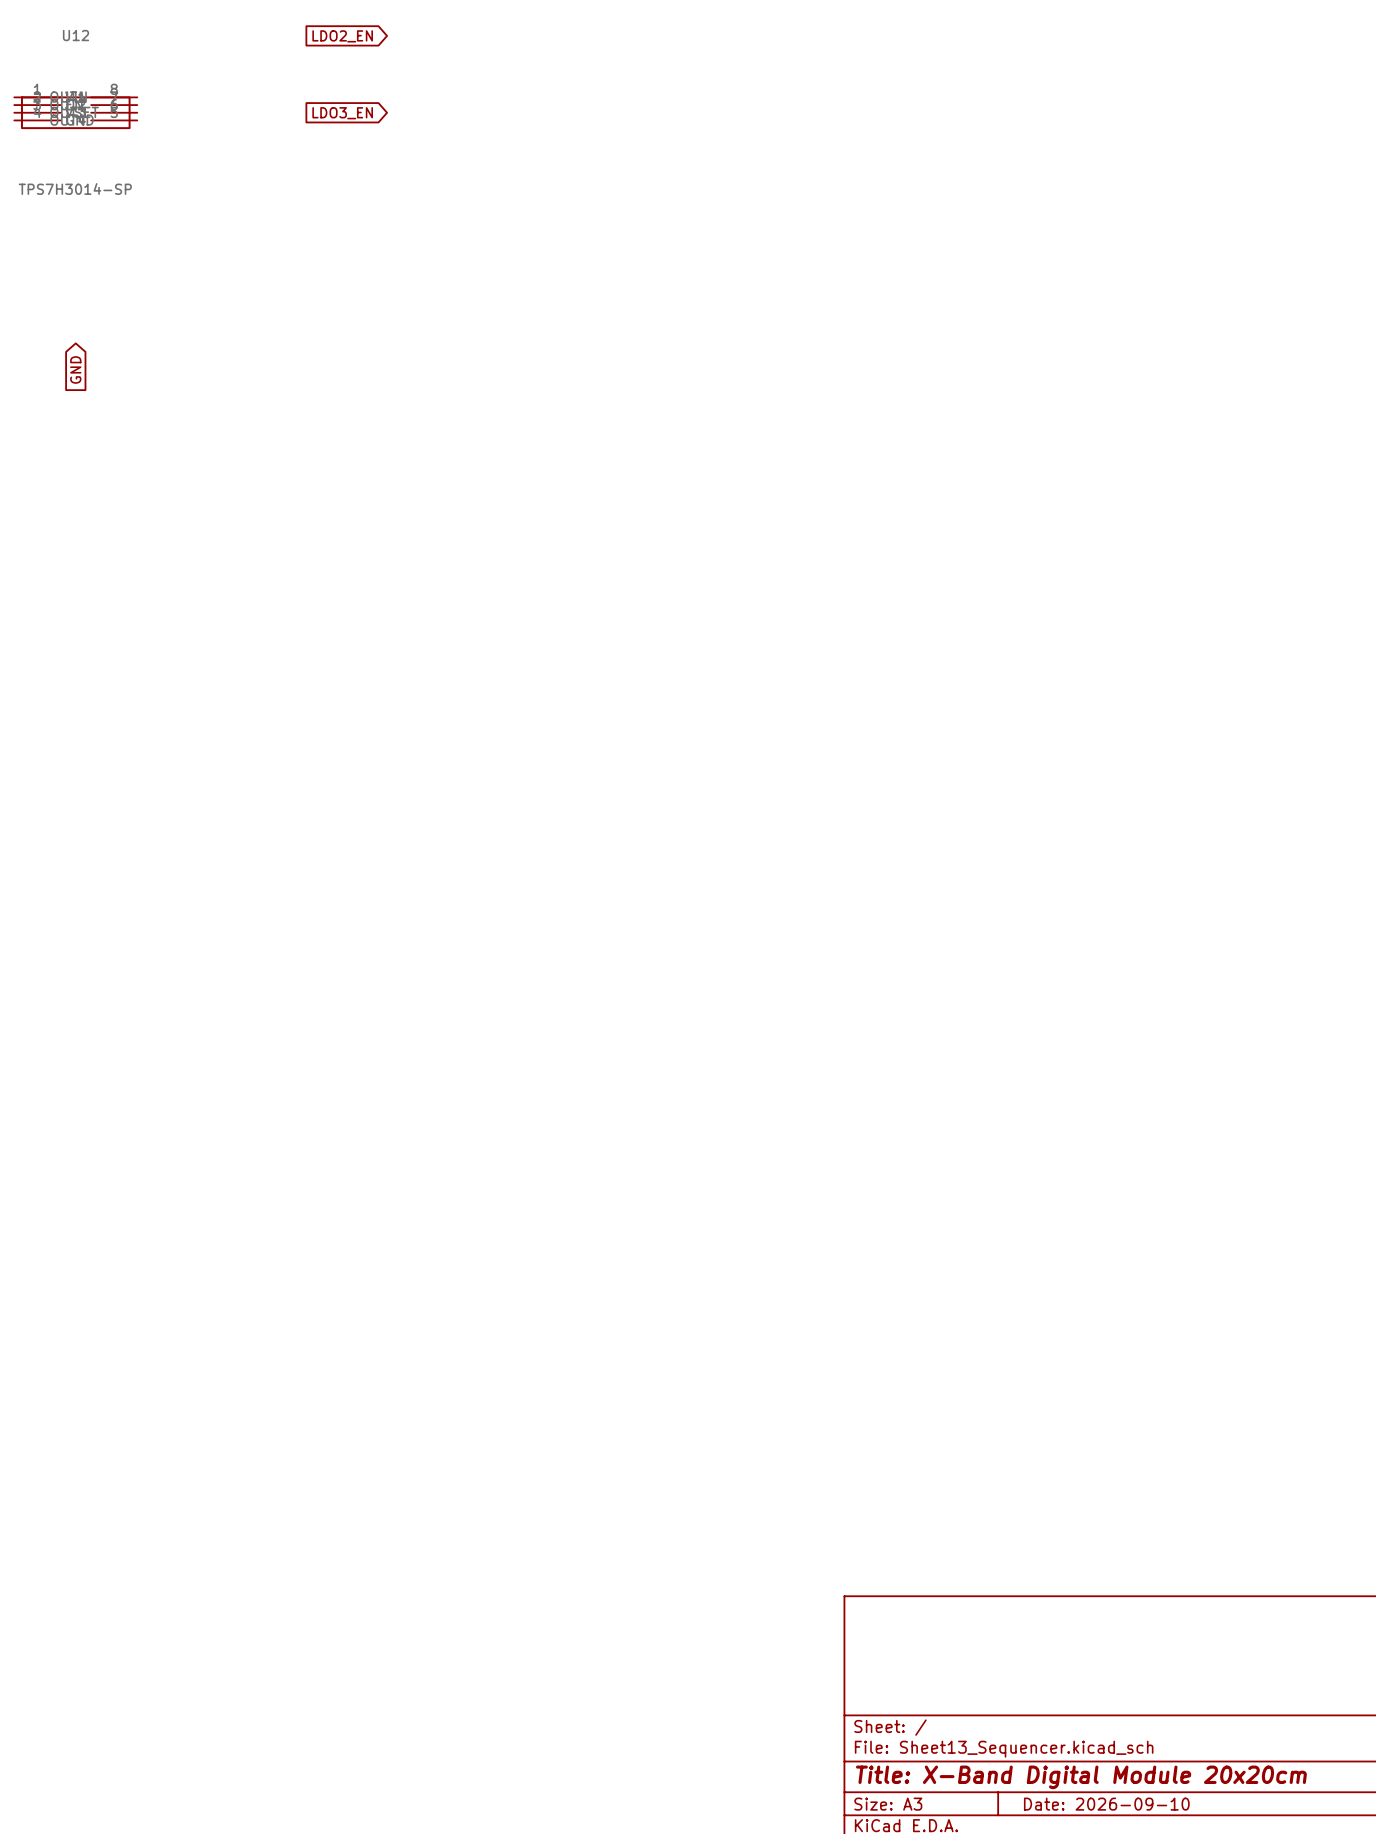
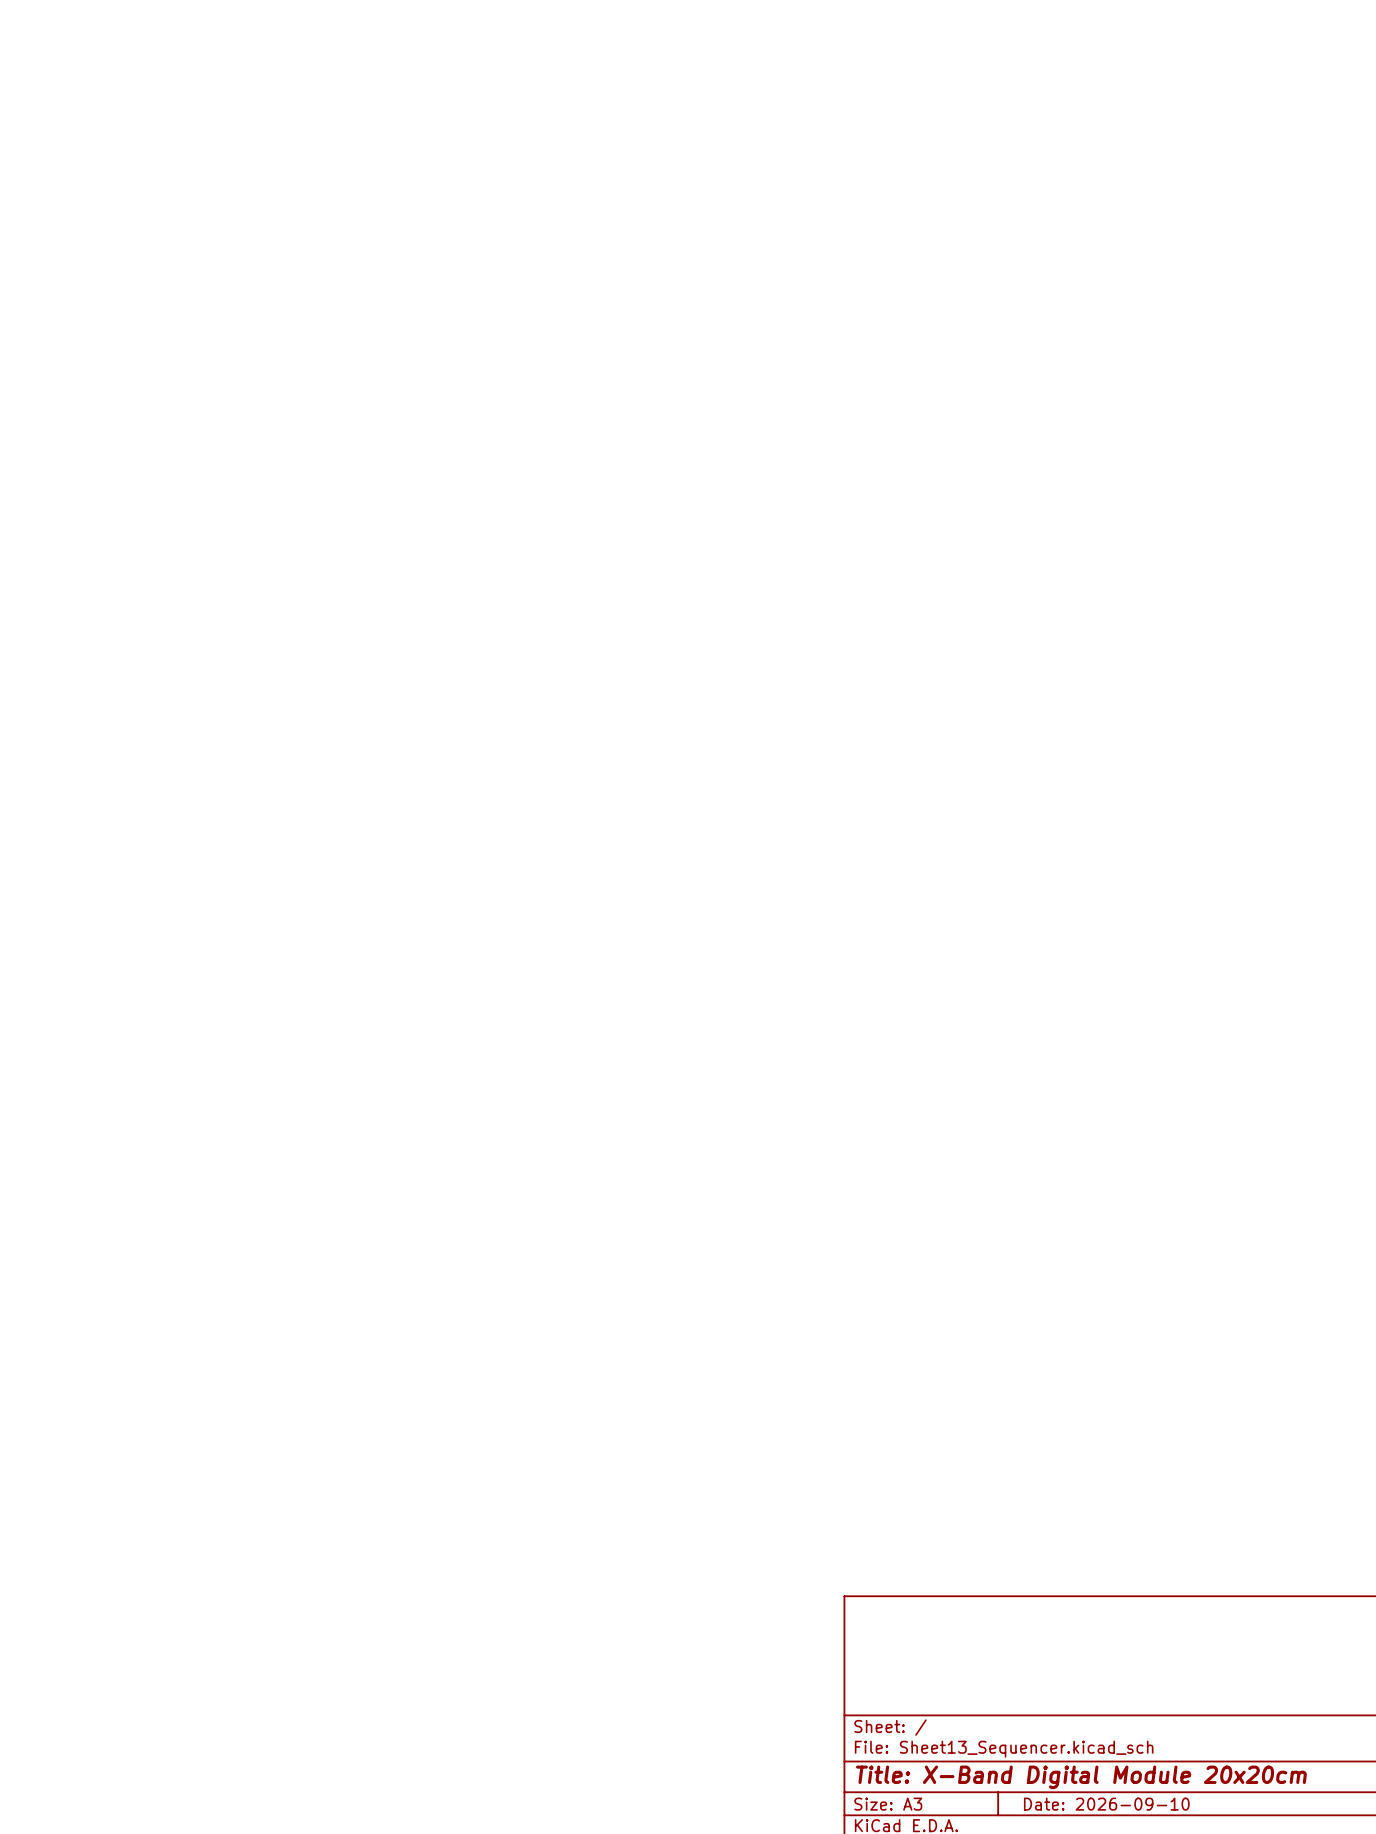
global label: LDO2_EN (342, 36) -> none
U12: TPS7H3014-SP (75, 112) -> none
global label: LDO3_EN (342, 113) -> none
global label: GND (75, 369) -> none

